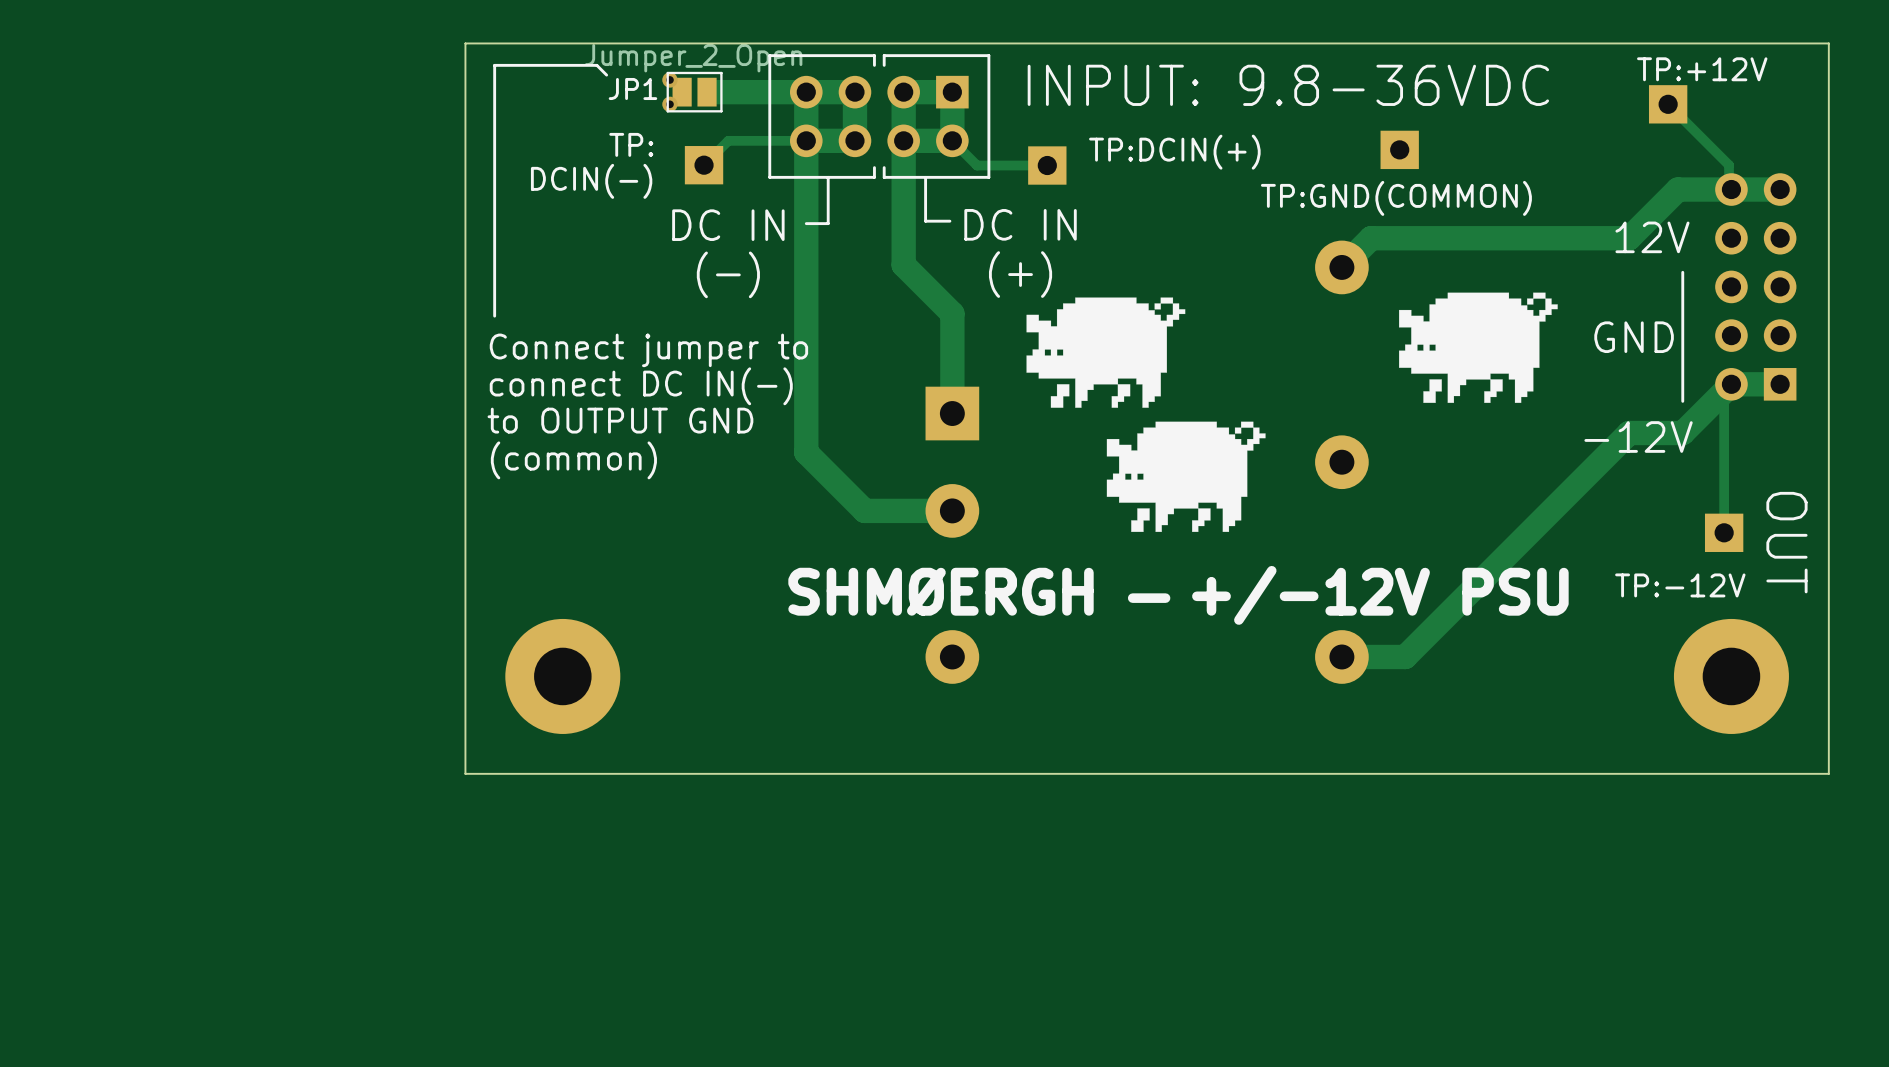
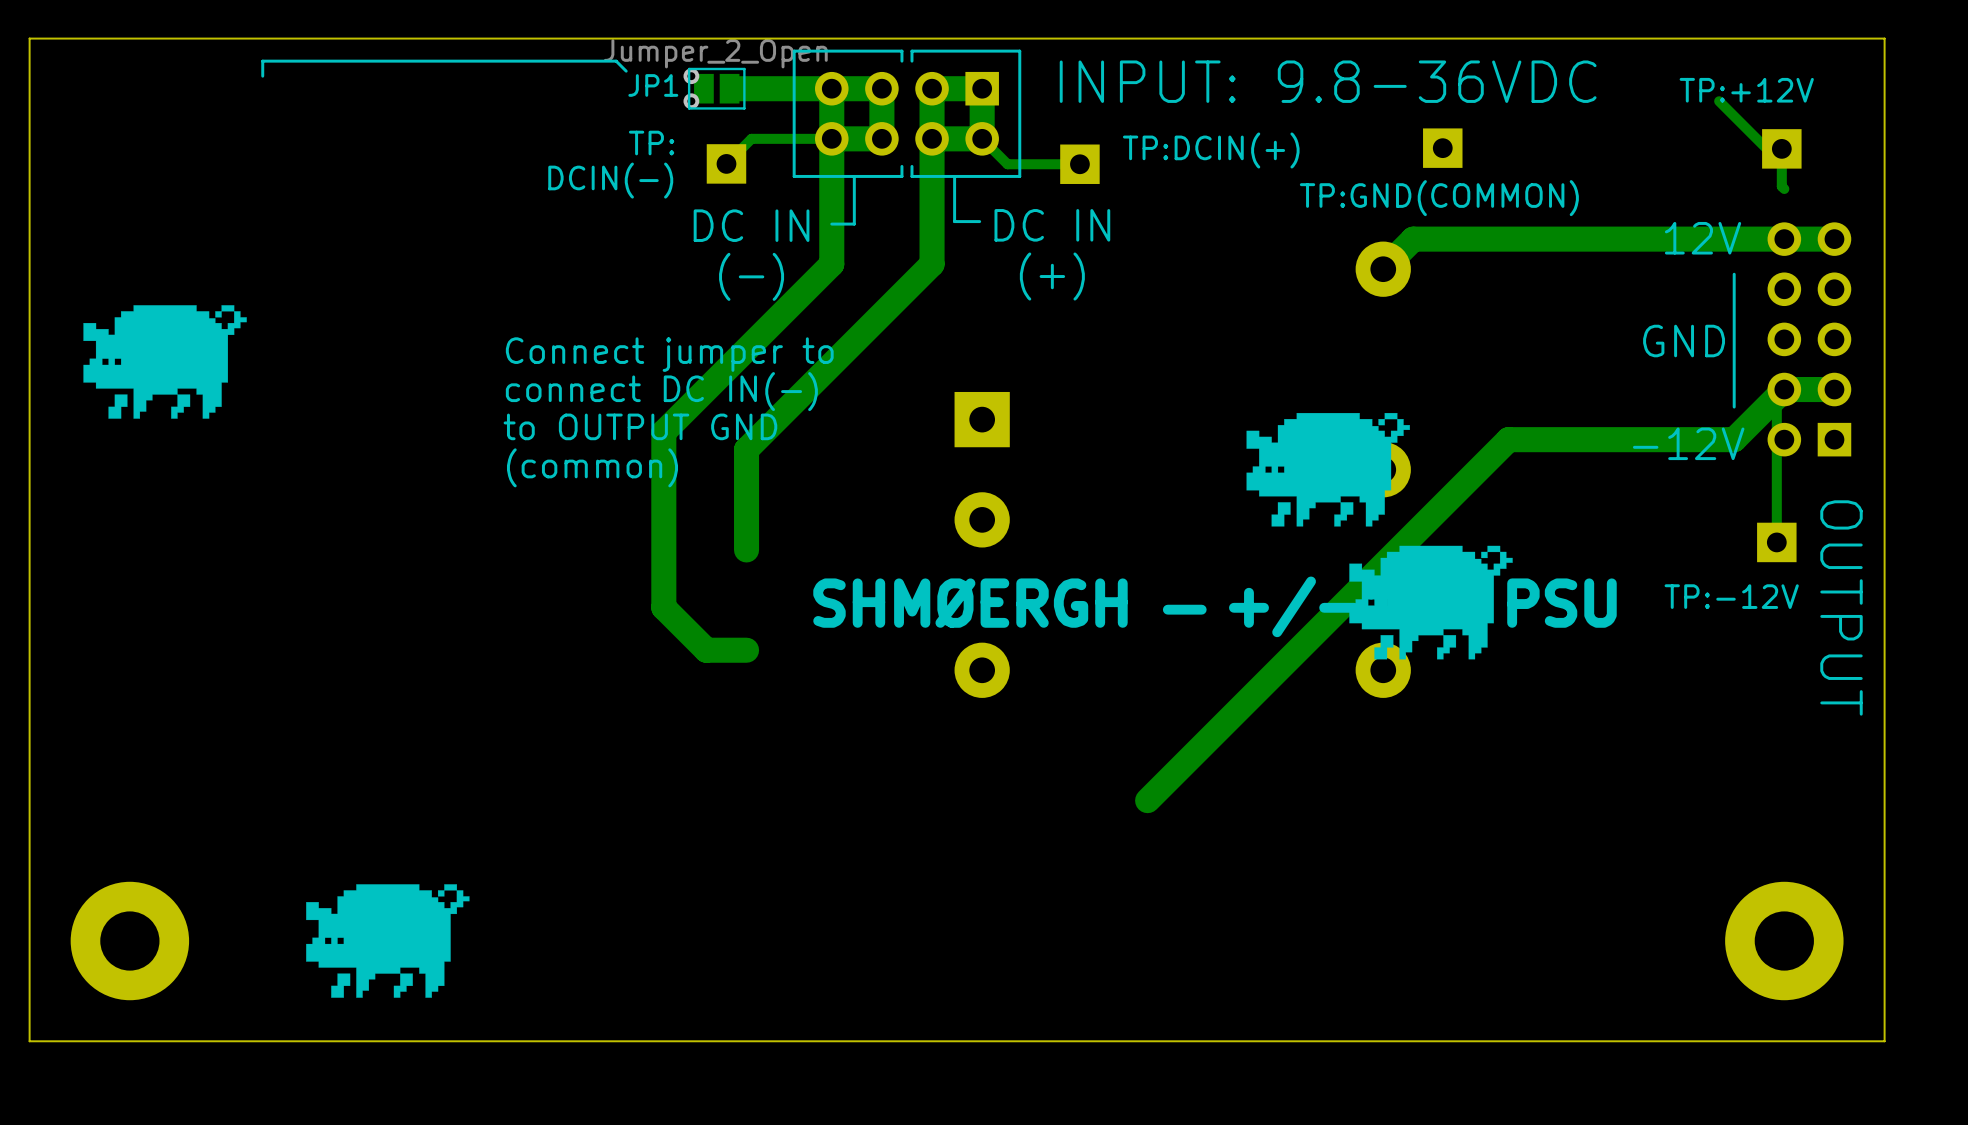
board edge: (465, 43) (465, 773) (1828, 773) -> (480, 38) (29, 38) (29, 1041) (1884, 1041) (1884, 790)
line: (494, 65) (494, 316) -> (510, 61) (262, 61) (262, 76)
text position: TP:+12V (1702, 69) -> TP:+12V (1746, 90)
part position: (1668, 104) -> (1781, 148)
track: (1780, 189) (1677, 189) (1629, 238) -> (1834, 239) (1679, 239)
track: (806, 262) (806, 452) (864, 510) (952, 510) -> (831, 264) (663, 432) (663, 607) (706, 650) (746, 650)
track: (903, 262) (903, 265) (952, 313) (952, 413) -> (932, 264) (746, 449) (746, 549)
part position: (1755, 286) -> (1809, 339)
drawing: [1399, 292, 1558, 403] -> none
drawing: [1026, 297, 1186, 408] -> none
drawing: none -> [83, 305, 247, 419]
track: (1629, 433) (1405, 656) (1341, 656) -> (1679, 439) (1508, 439) (1147, 800)
drawing position: (1186, 476) -> (1328, 469)
drawing: none -> [1349, 545, 1513, 660]
text: OUT (1786, 542) -> OUTPUT (1841, 607)
part: (562, 676) -> none
part position: (1731, 676) -> (1784, 941)
drawing: none -> [306, 884, 470, 998]
part: none -> (129, 941)

